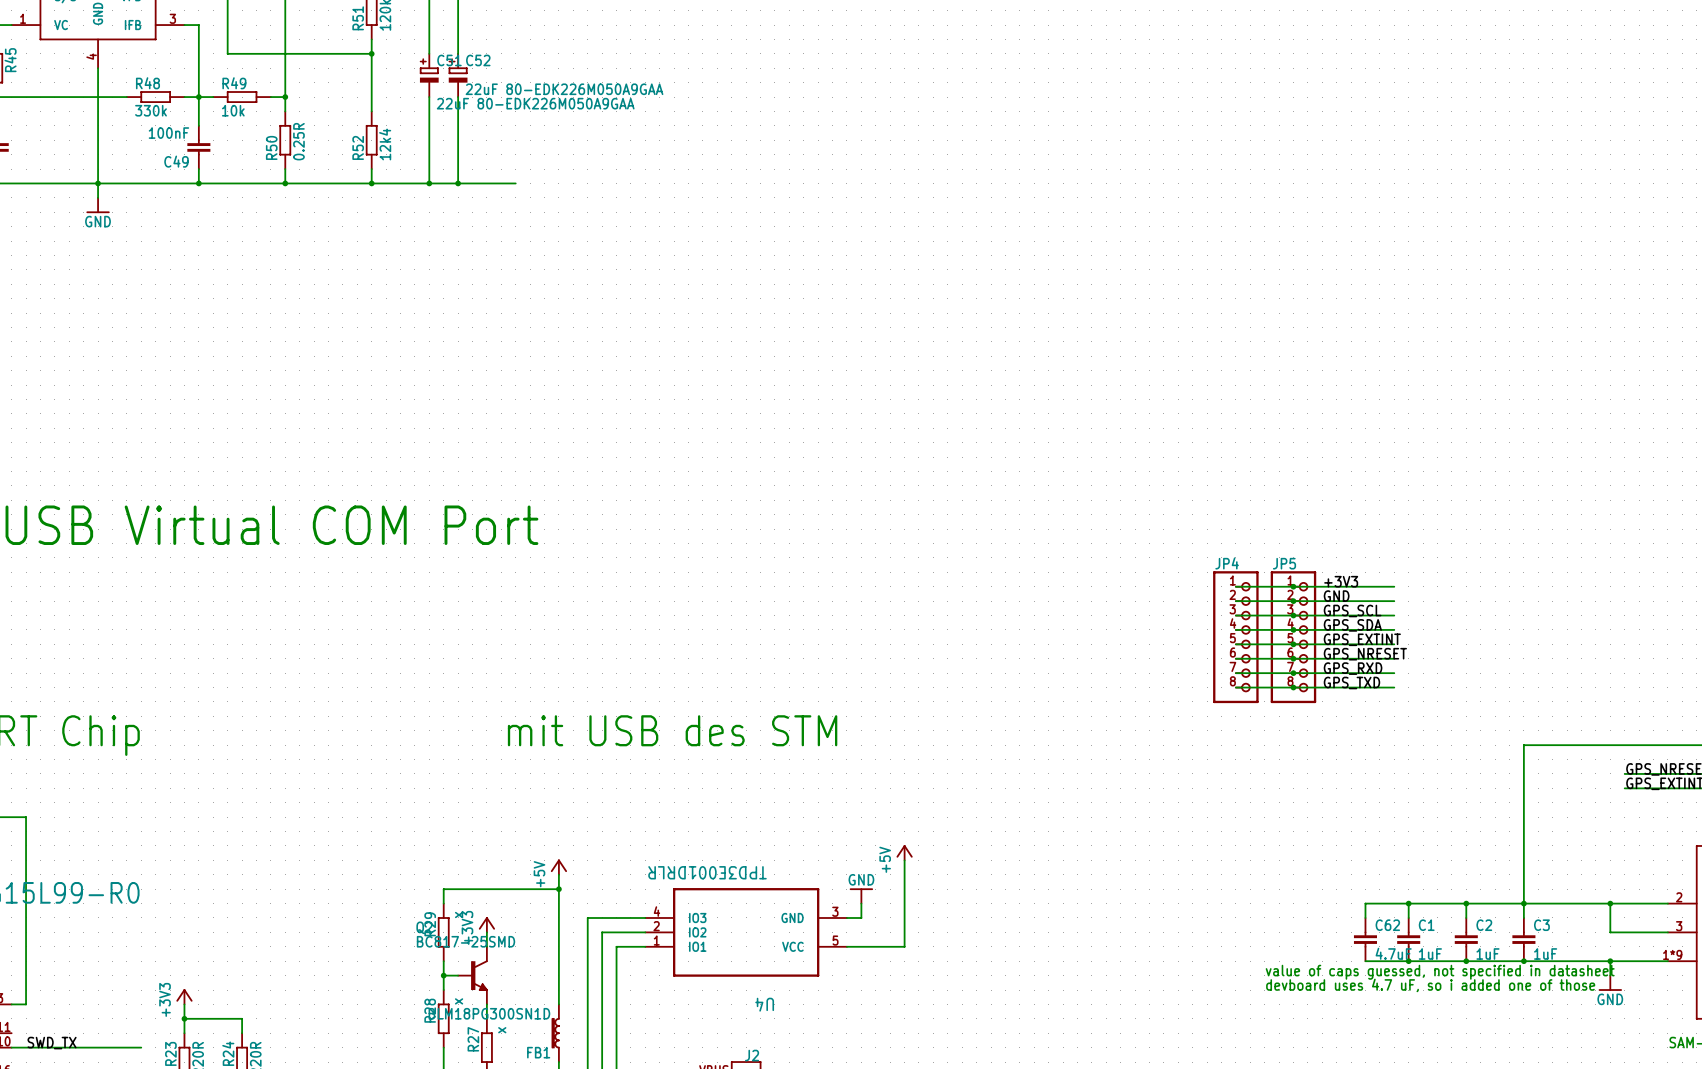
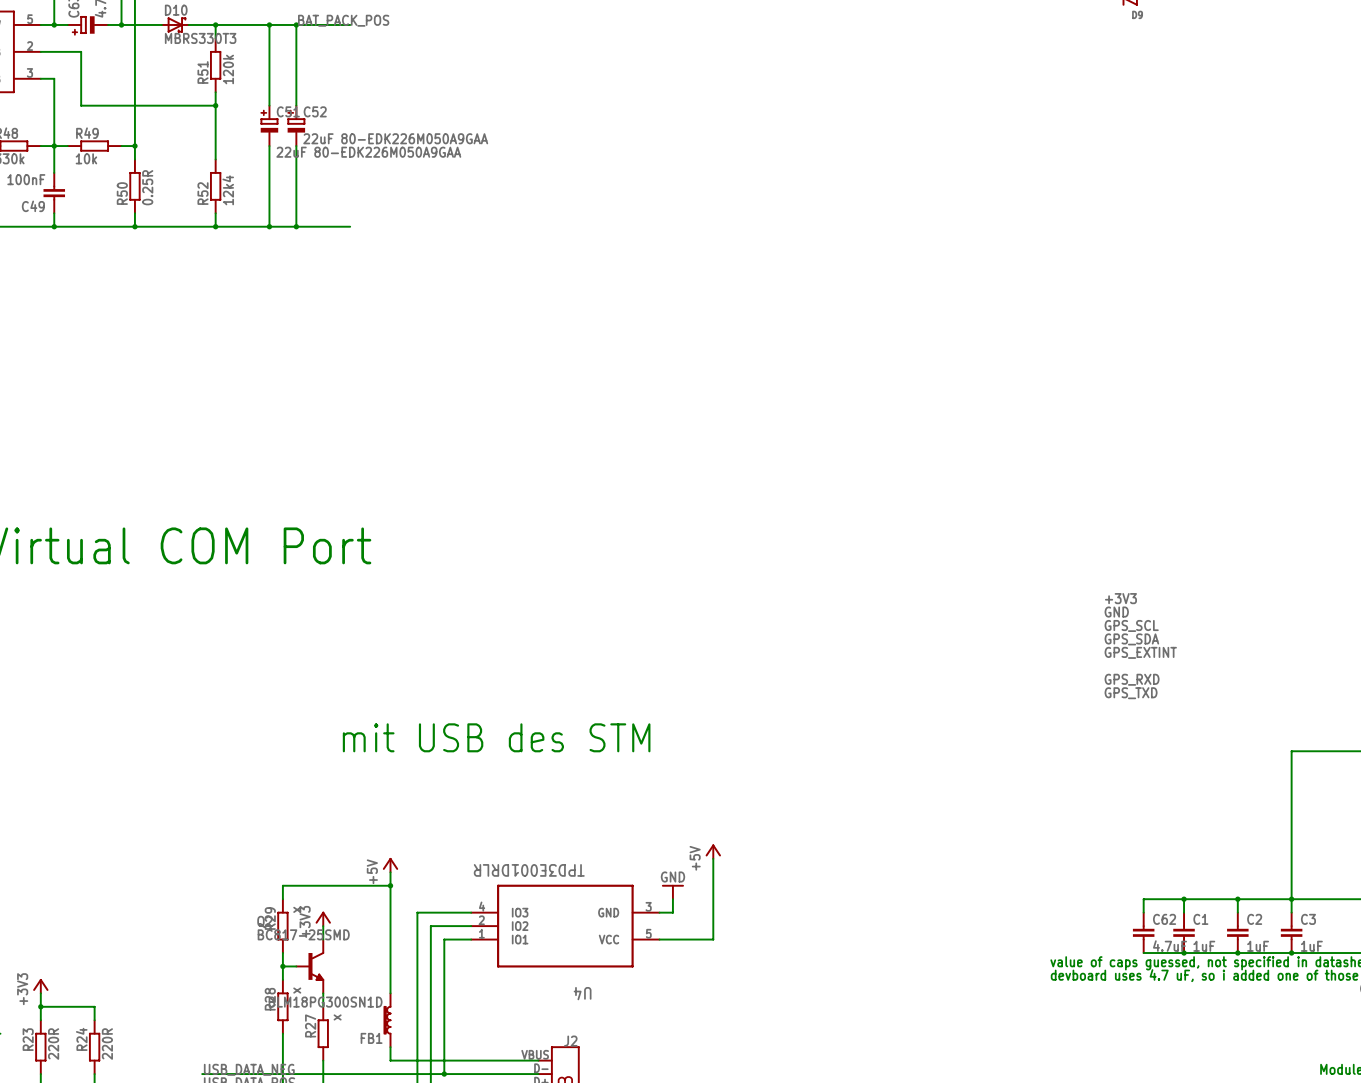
wire: (1235, 586) (1394, 586) -> none
junction: (1293, 586) -> none
wire: (1235, 601) (1394, 601) -> none
junction: (1293, 601) -> none
wire: (1235, 615) (1394, 615) -> none
junction: (1293, 615) -> none
wire: (1235, 629) (1394, 629) -> none
junction: (1293, 629) -> none
JP4: (1235, 637) -> none
JP5: (1293, 637) -> none
wire: (1235, 644) (1394, 644) -> none
junction: (1293, 644) -> none
label: GPS_NRESET (1365, 654) -> none
wire: (1235, 658) (1394, 658) -> none
junction: (1293, 658) -> none
wire: (1235, 673) (1394, 673) -> none
junction: (1293, 673) -> none
wire: (1235, 687) (1394, 687) -> none
junction: (1293, 687) -> none

